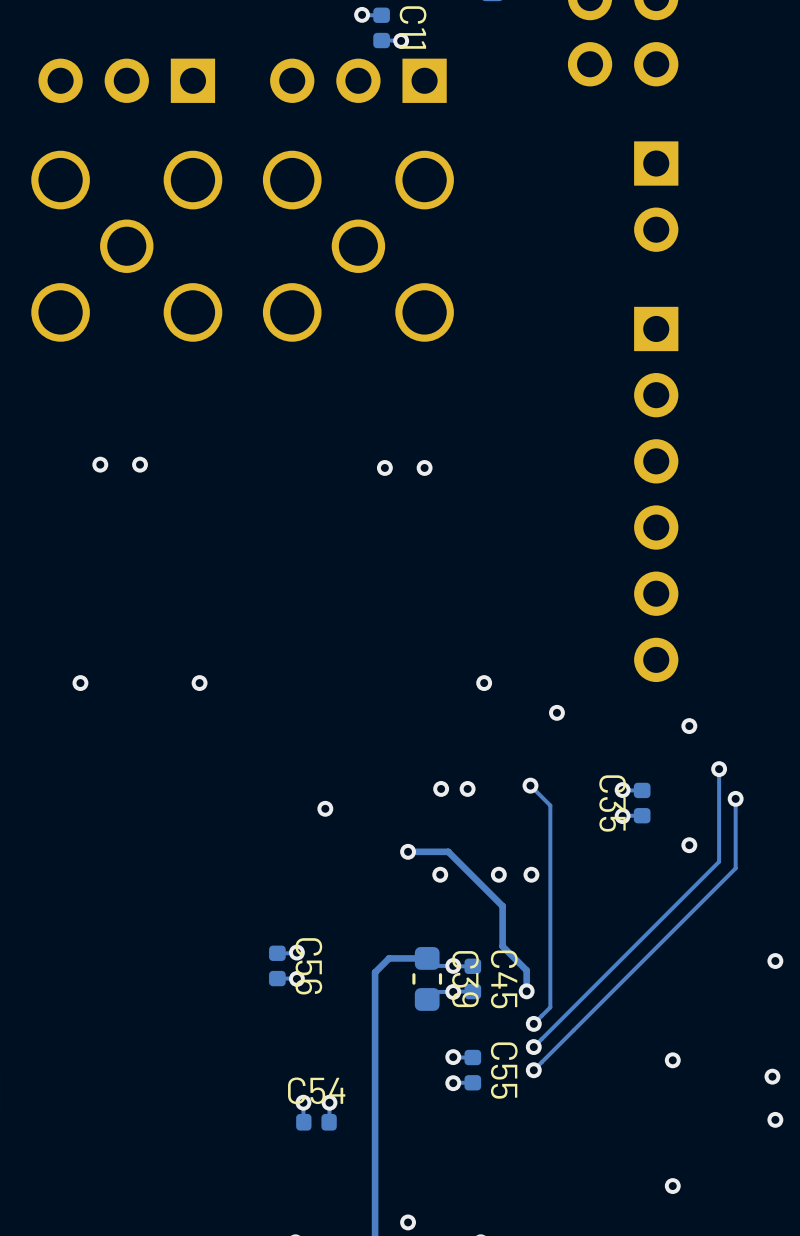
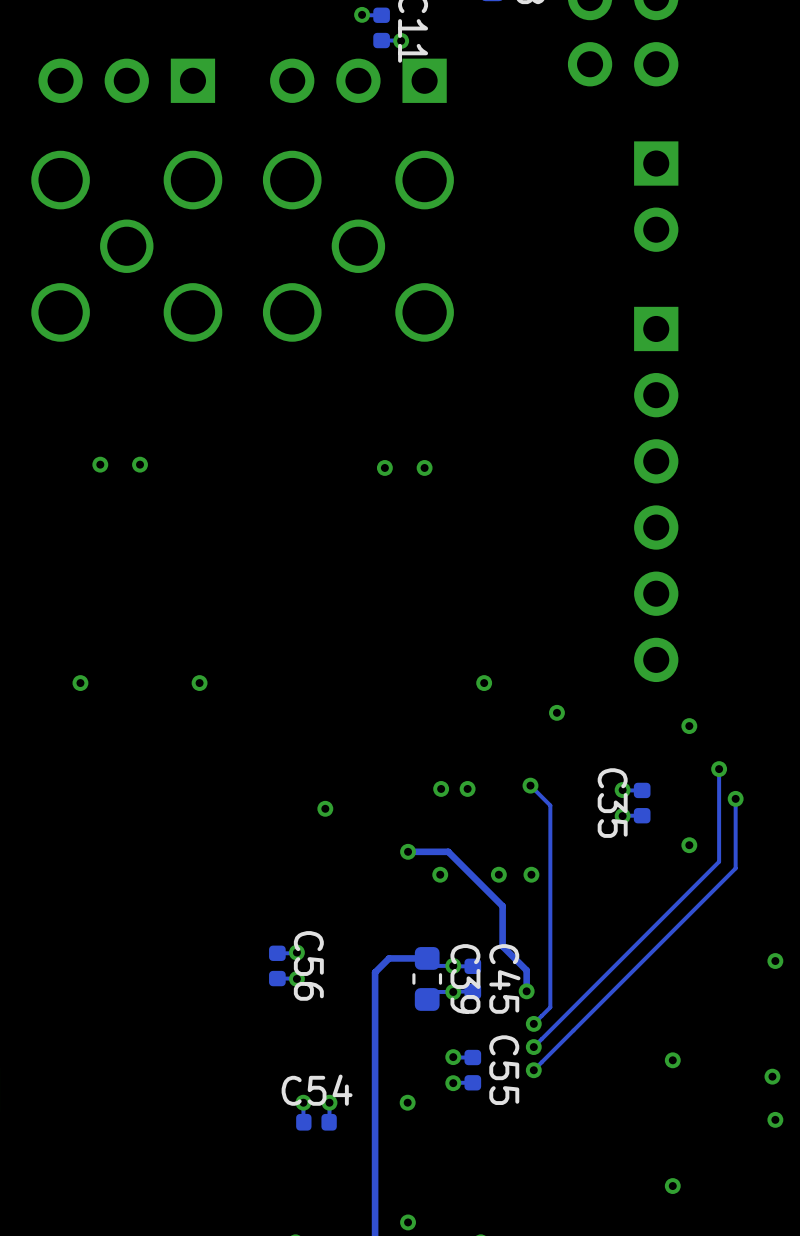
via: none -> (407, 1102)

